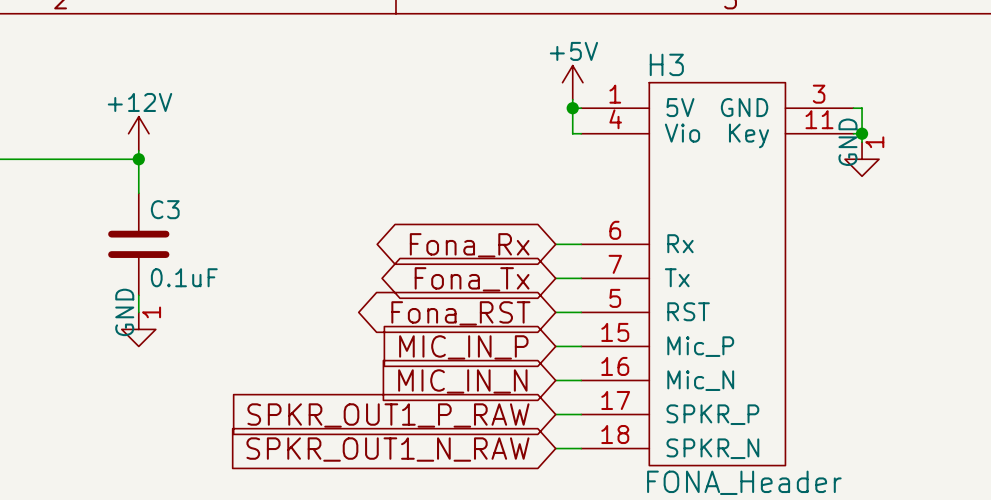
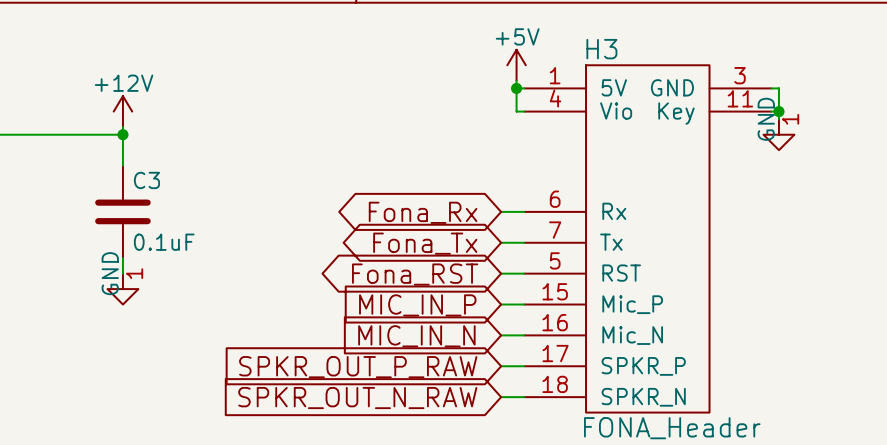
global label: SPKR_OUT1_P_RAW (388, 415) -> SPKR_OUT_P_RAW (358, 367)
global label: SPKR_OUT1_N_RAW (387, 449) -> SPKR_OUT_N_RAW (357, 398)

